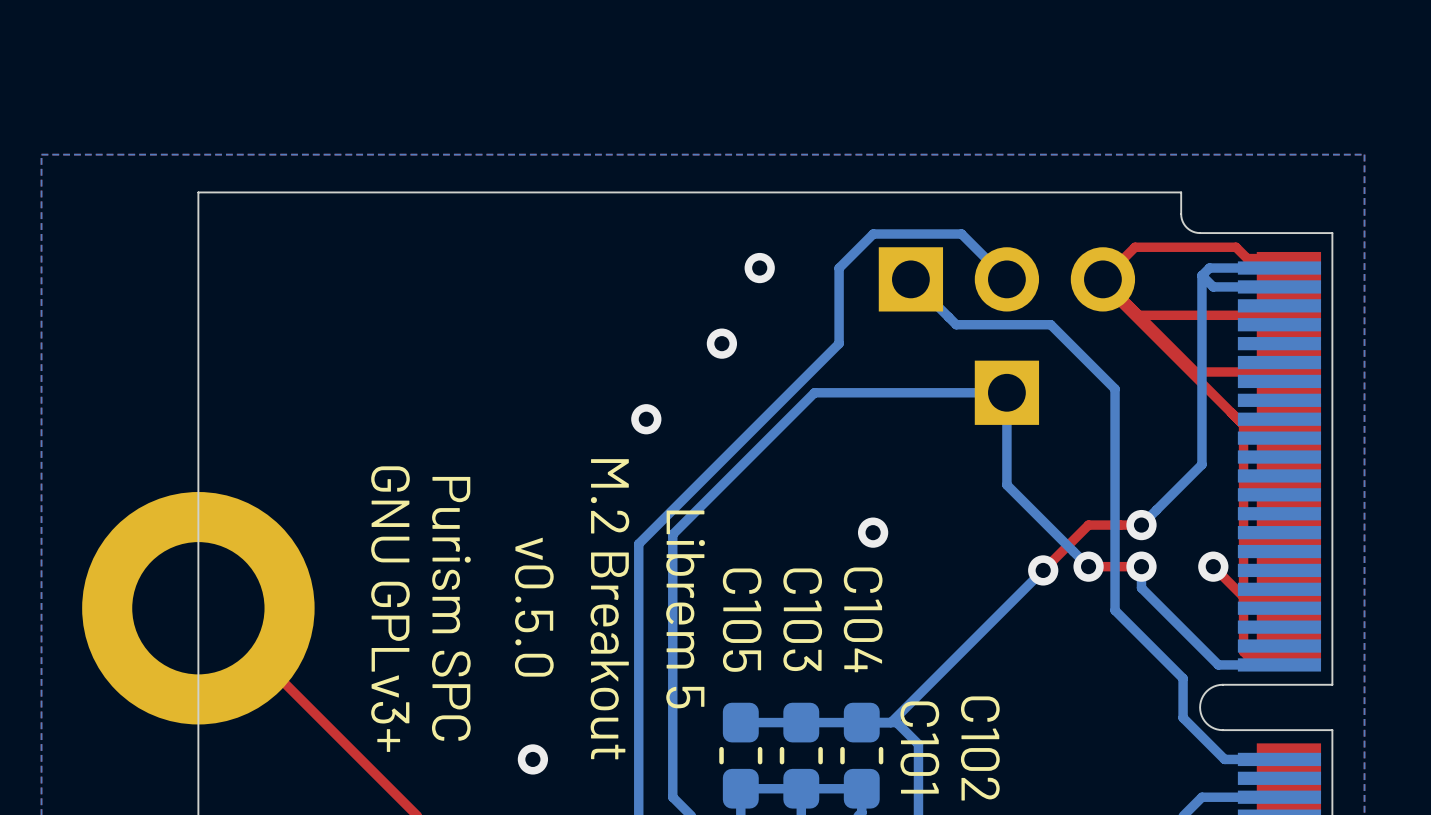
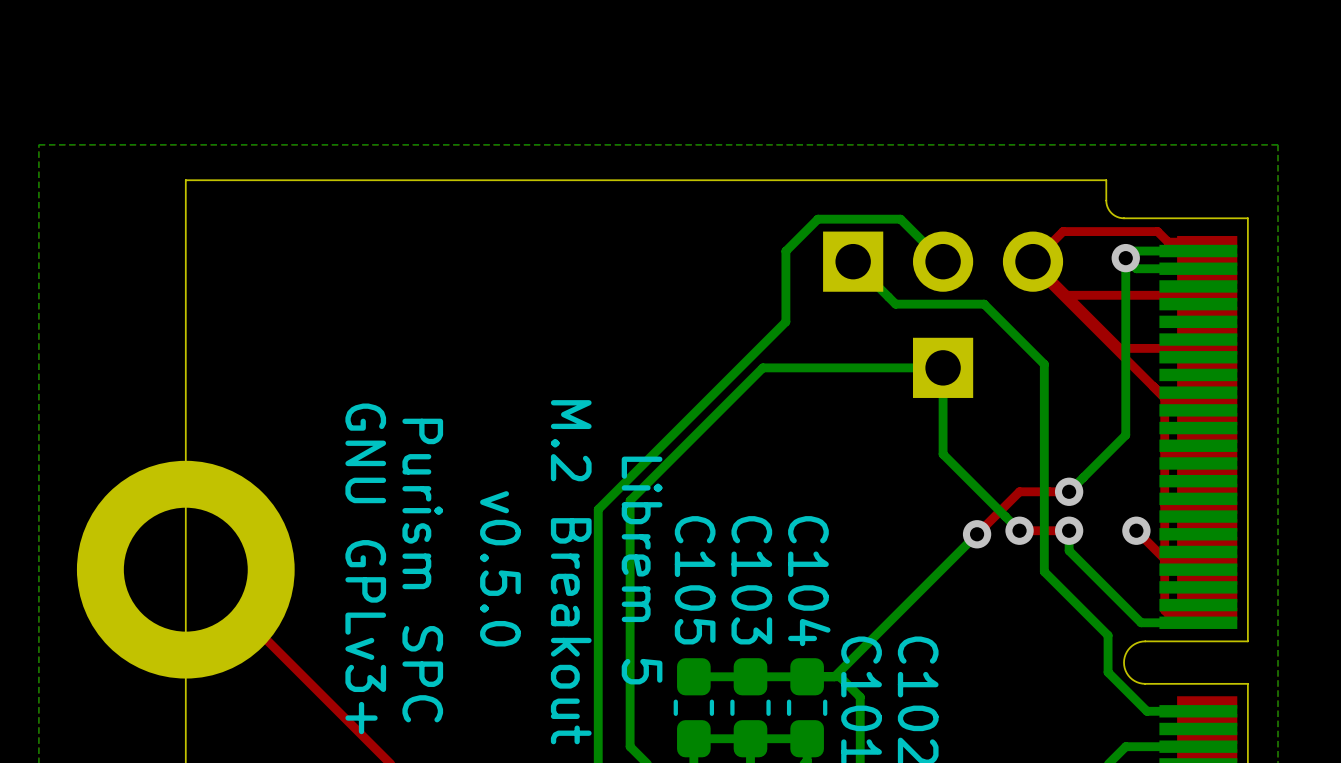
via: (759, 268) -> none
via: none -> (1125, 258)
via: (721, 343) -> none
via: (646, 419) -> none
via: (873, 532) -> none
via: (532, 759) -> none

